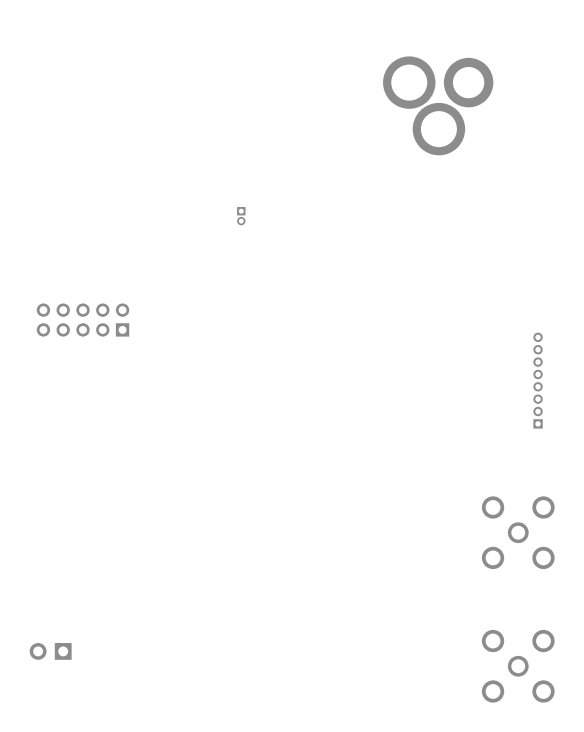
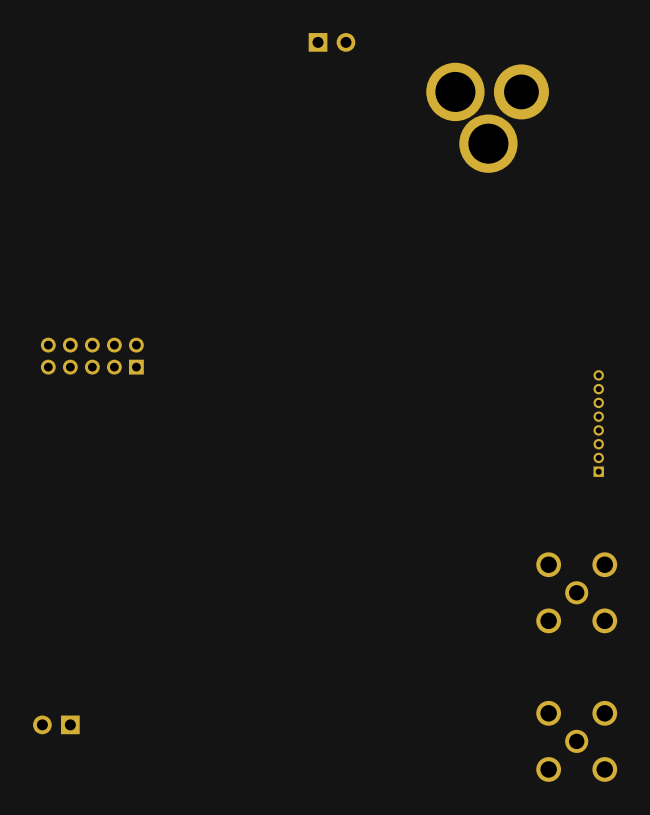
part: none -> (332, 42)
part: (241, 216) -> none

